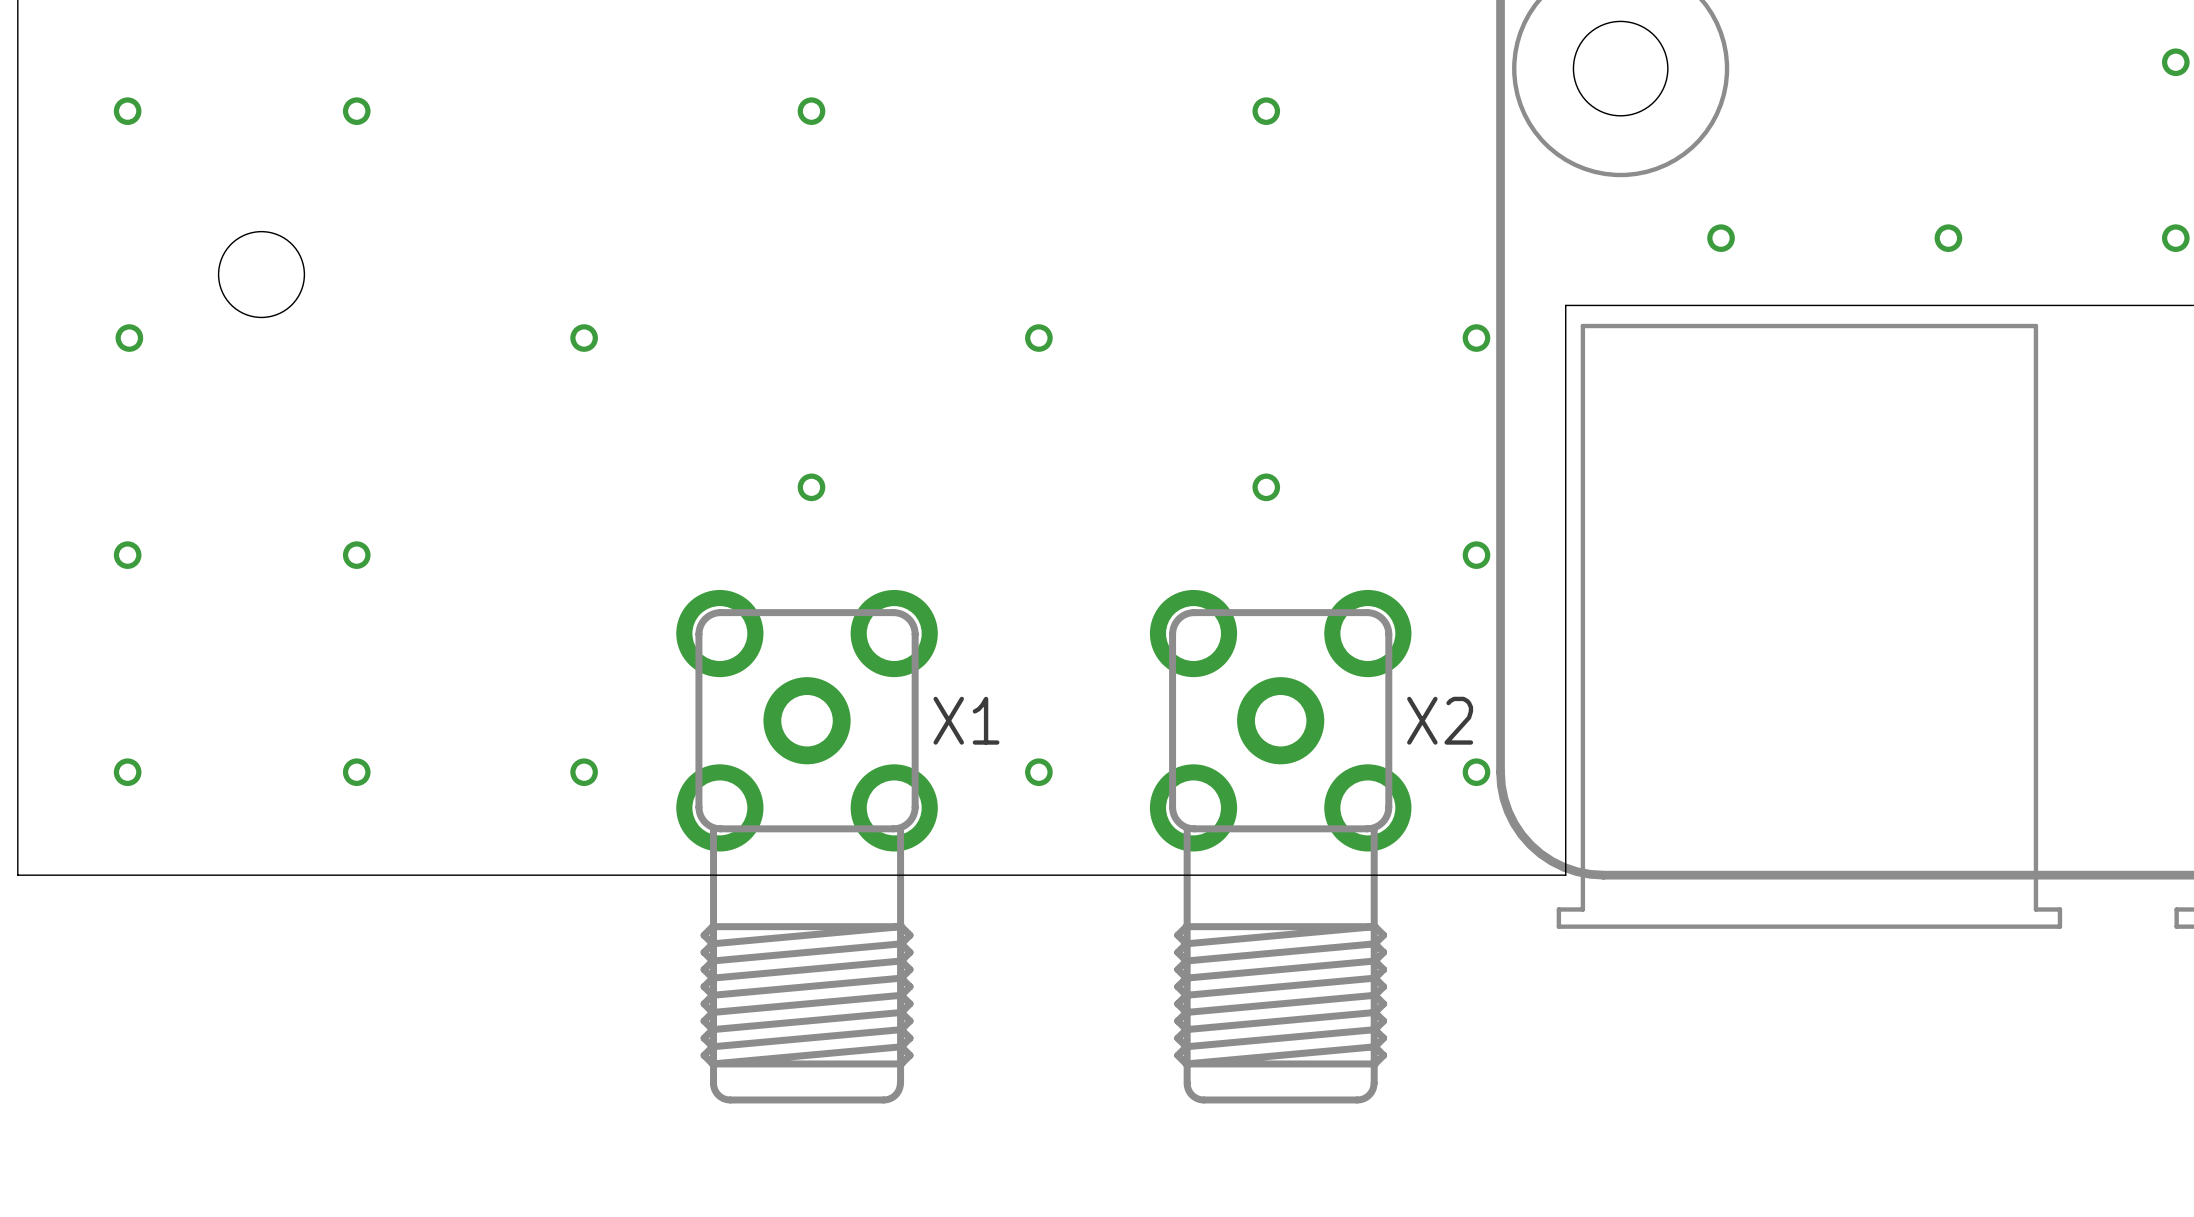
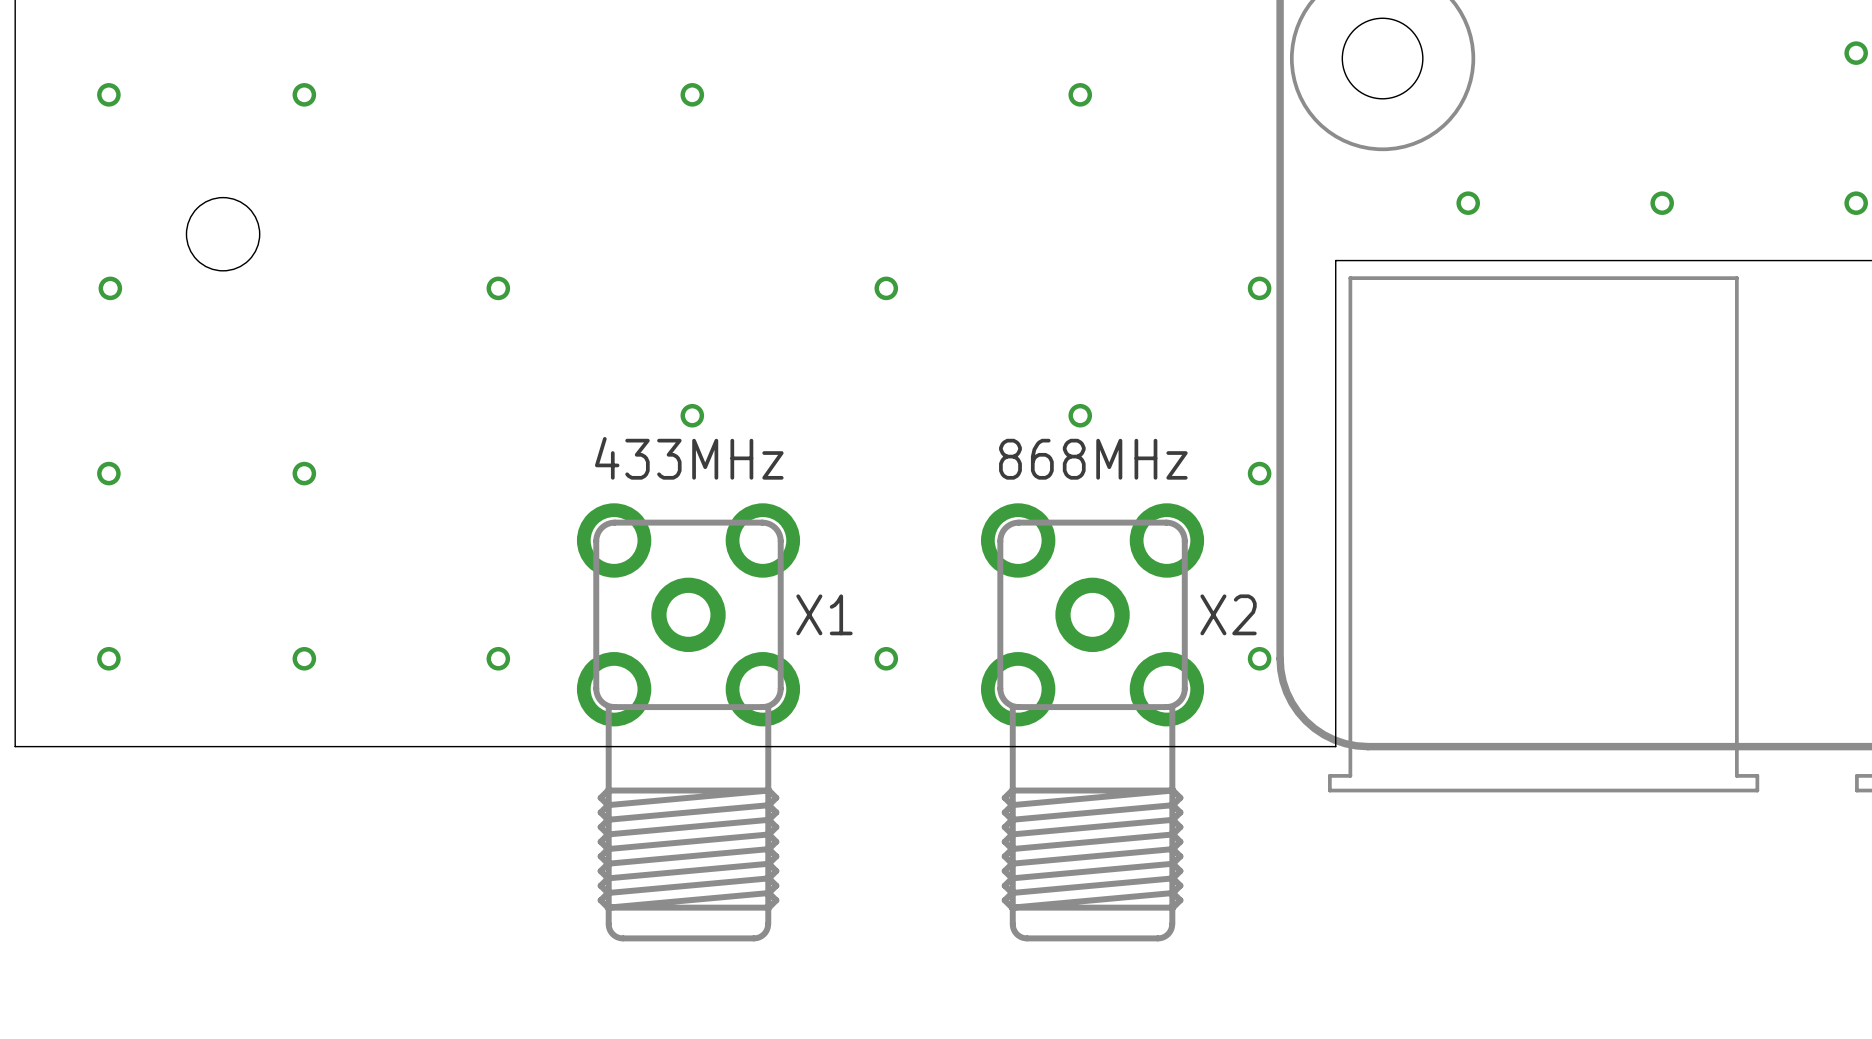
text: none -> 433MHz (689, 458)
text: none -> 868MHz (1093, 459)

